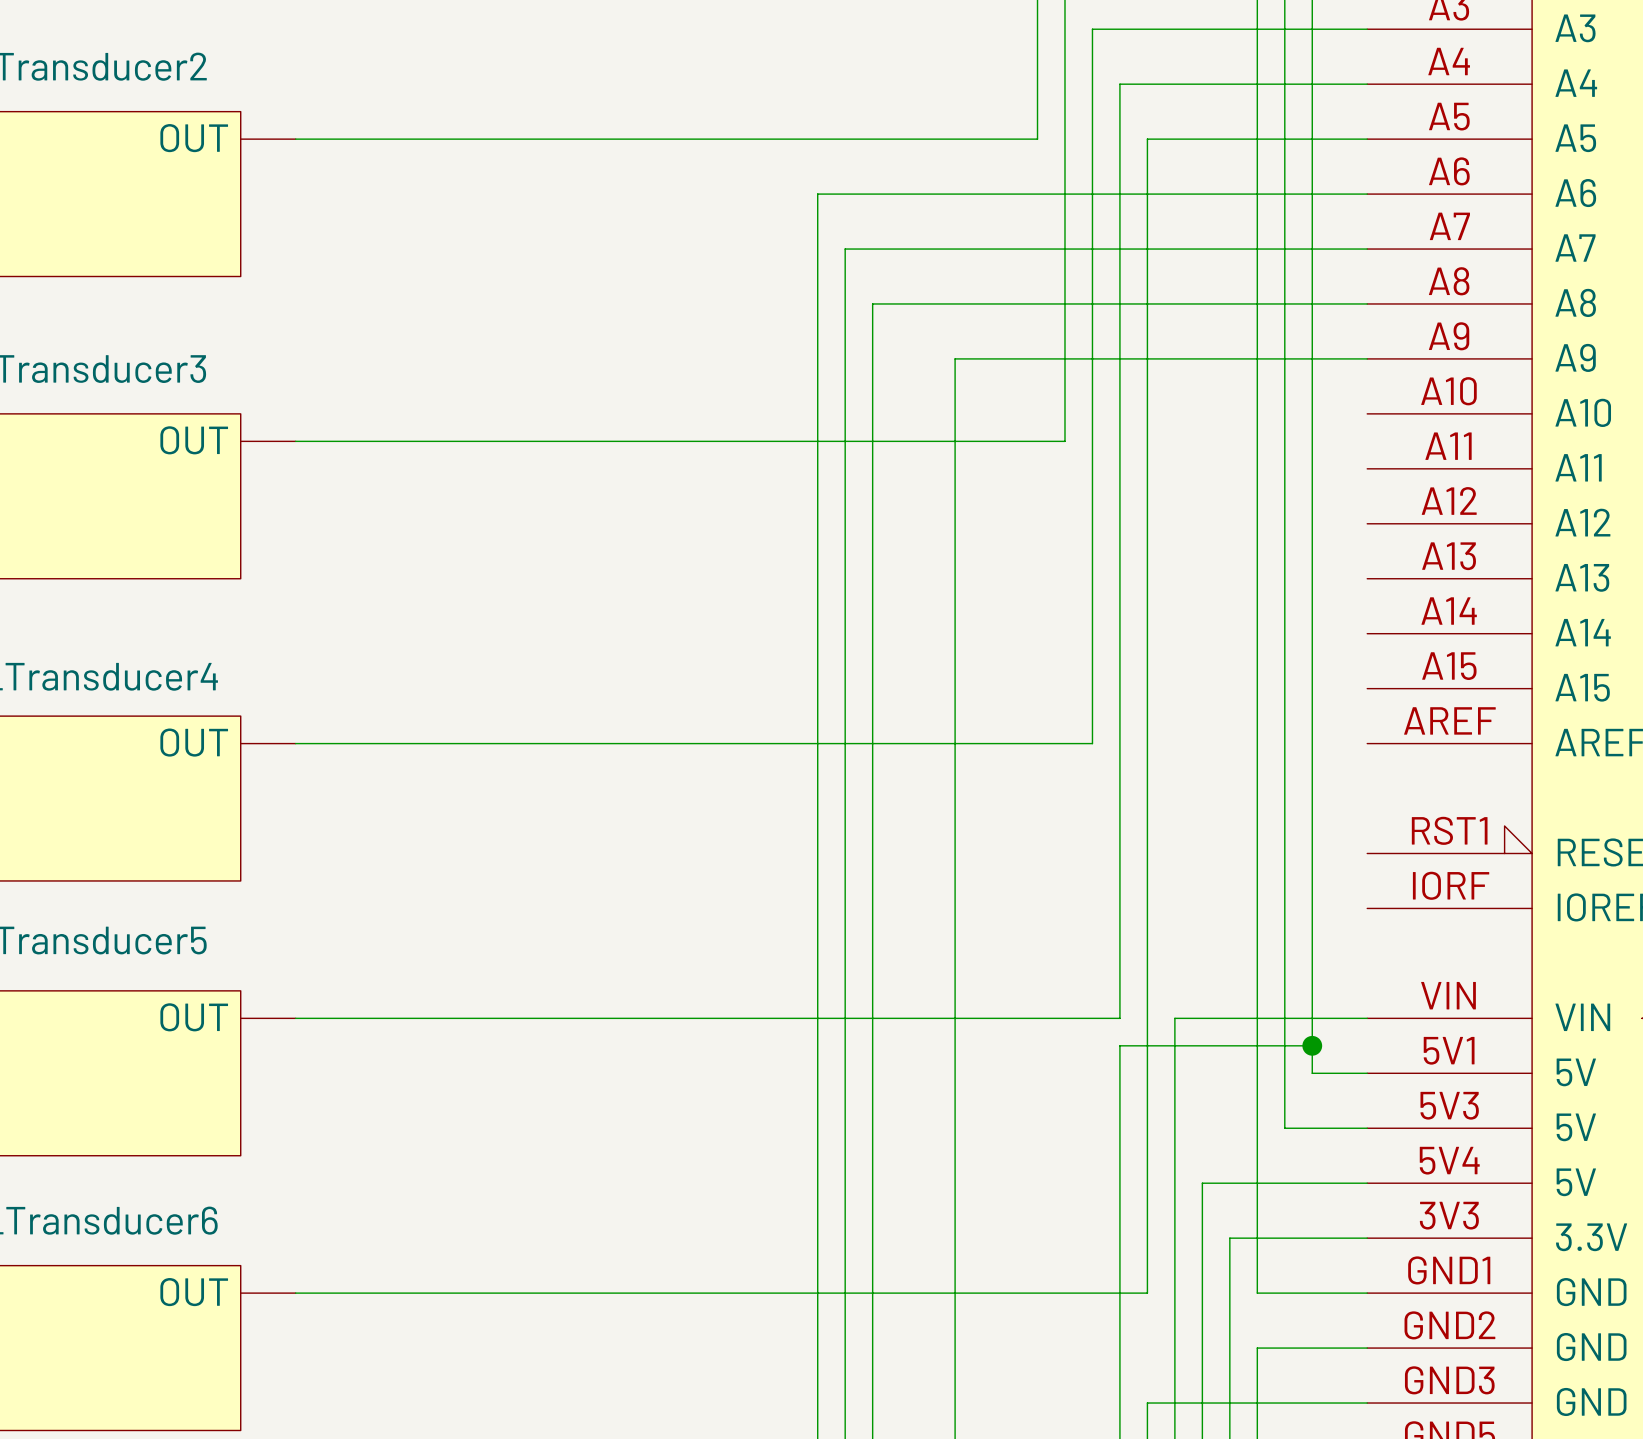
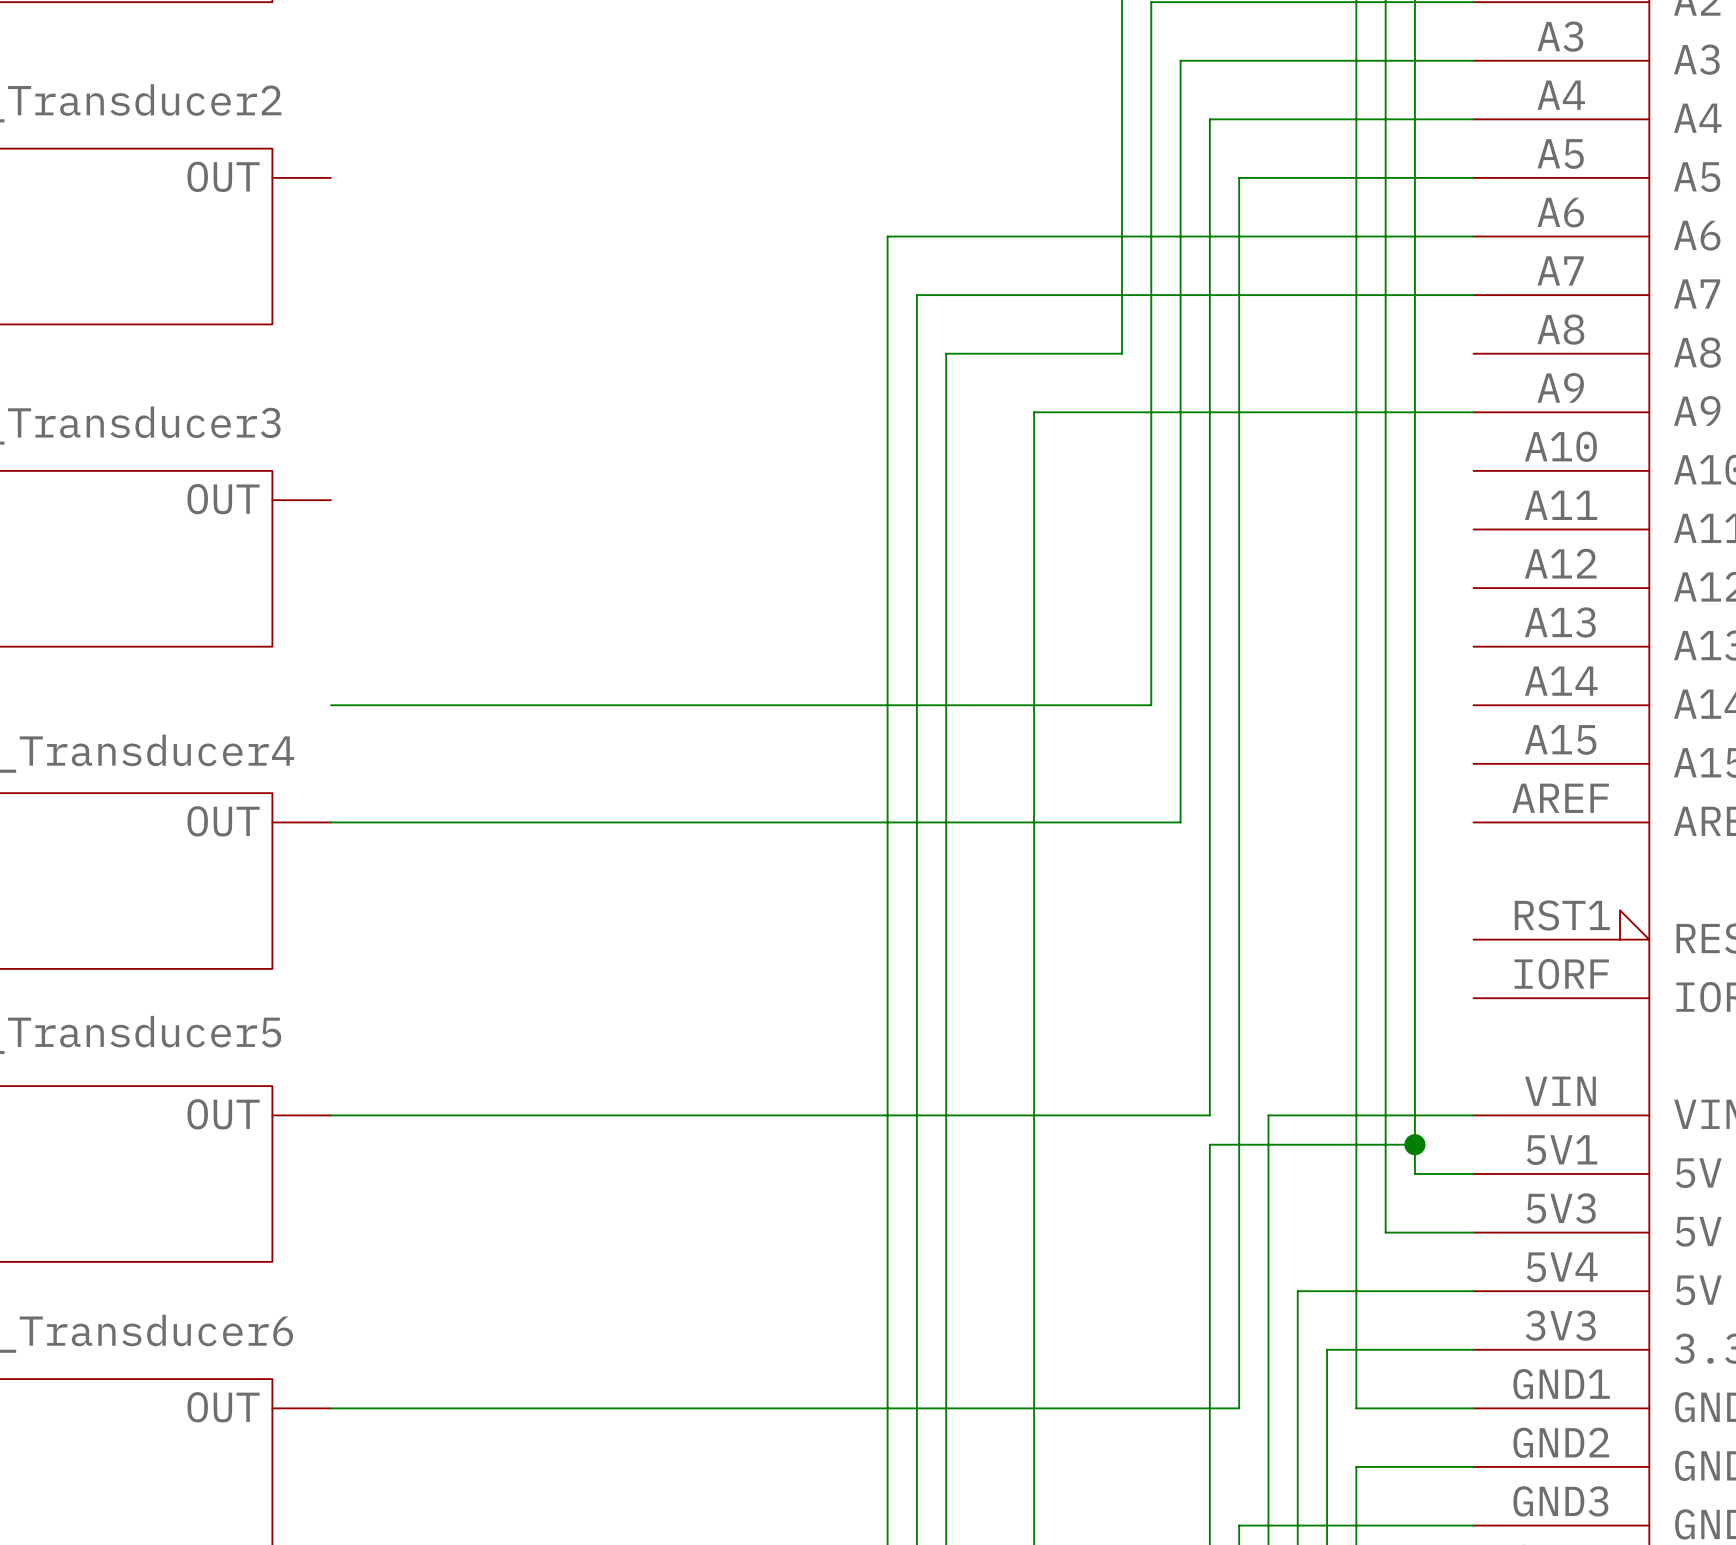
wire: (295, 139) (1037, 139) -> none
wire: (1037, 303) (1367, 303) -> (1121, 353) (1121, 177)
wire: (295, 441) (1064, 441) -> (330, 705) (1151, 705) (1151, 500)

